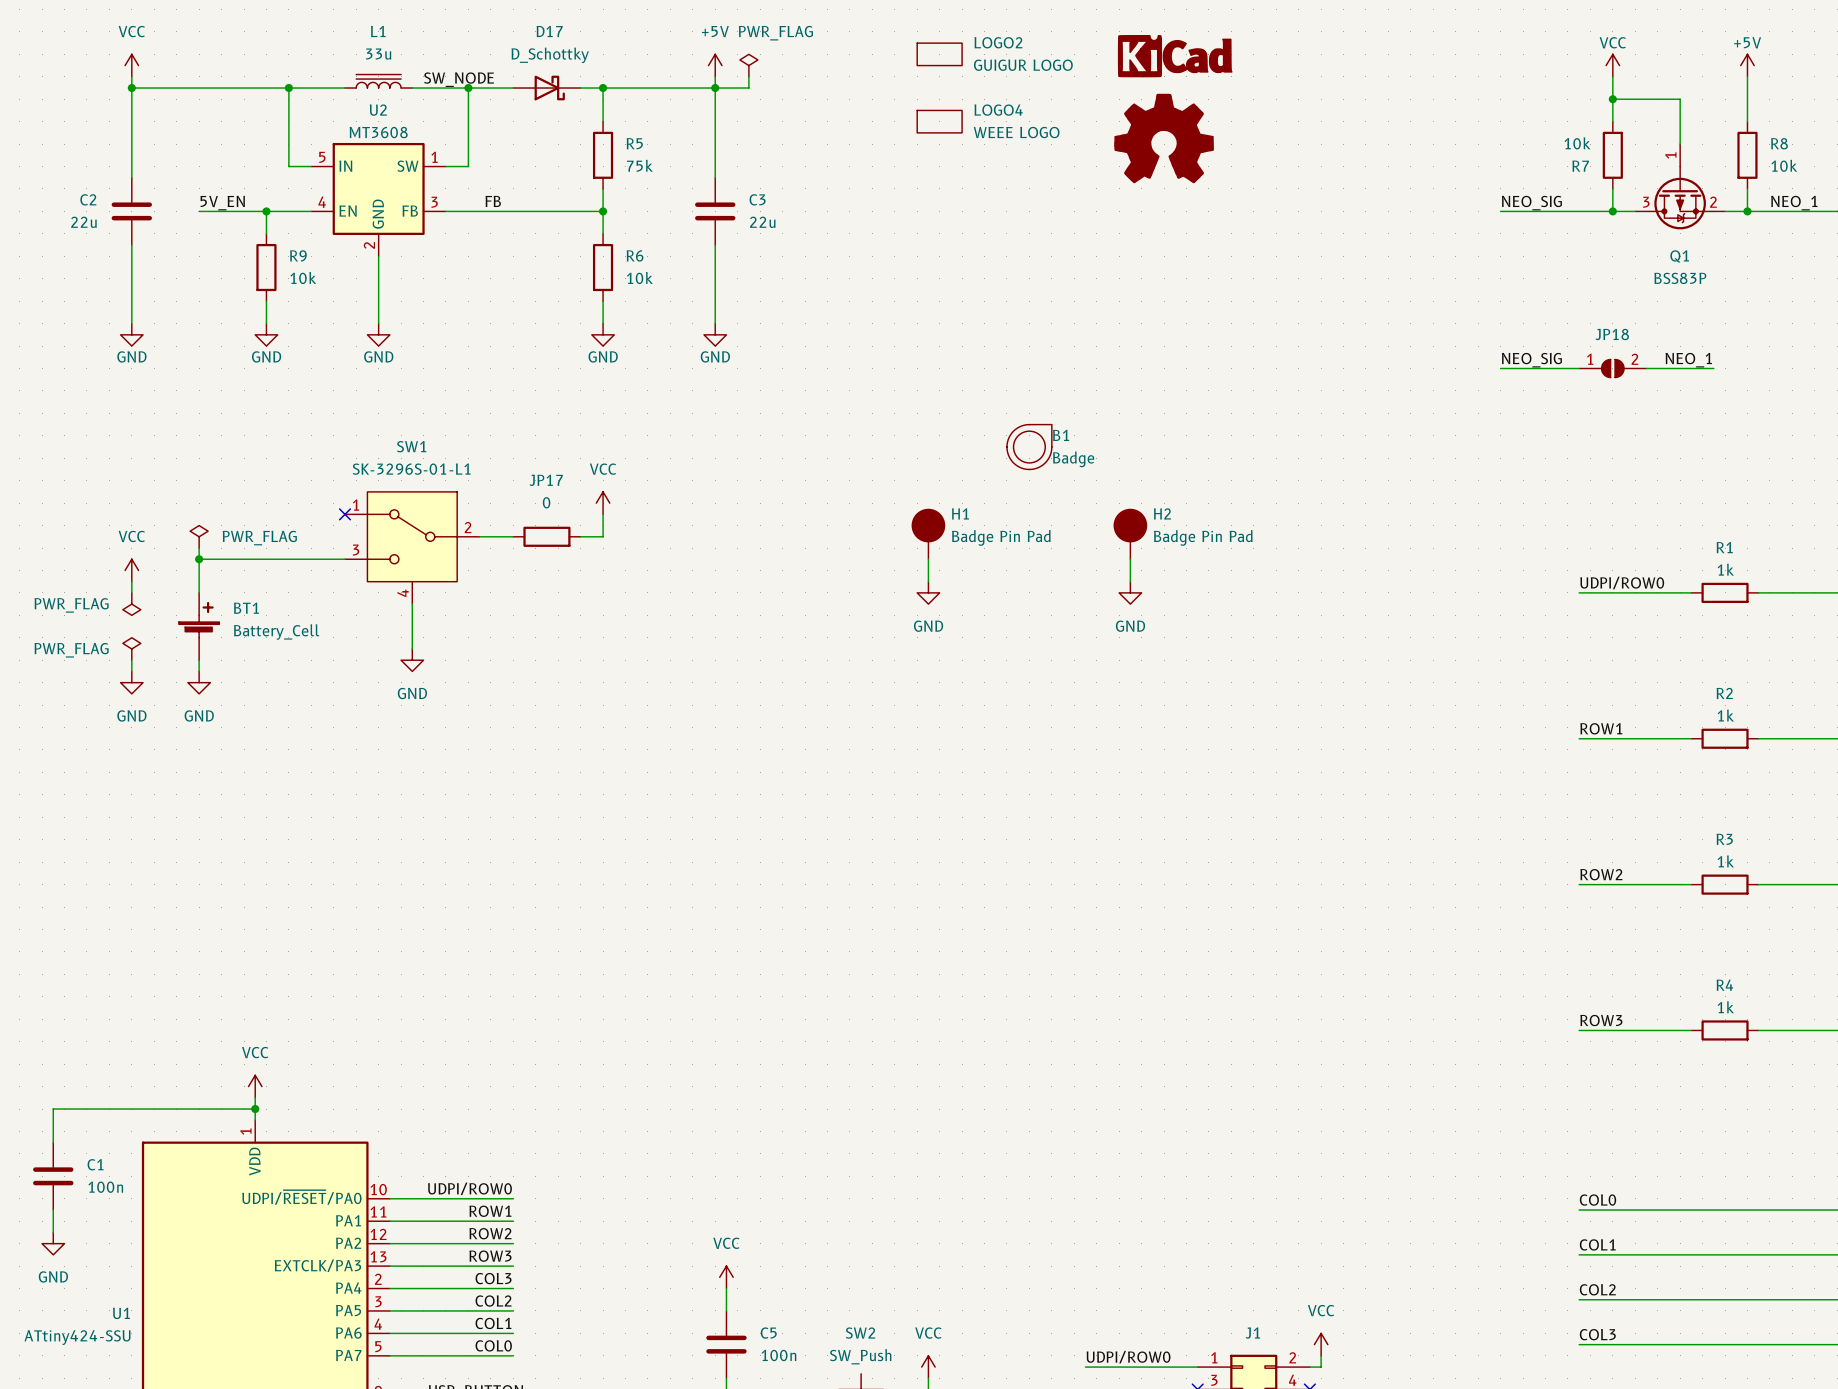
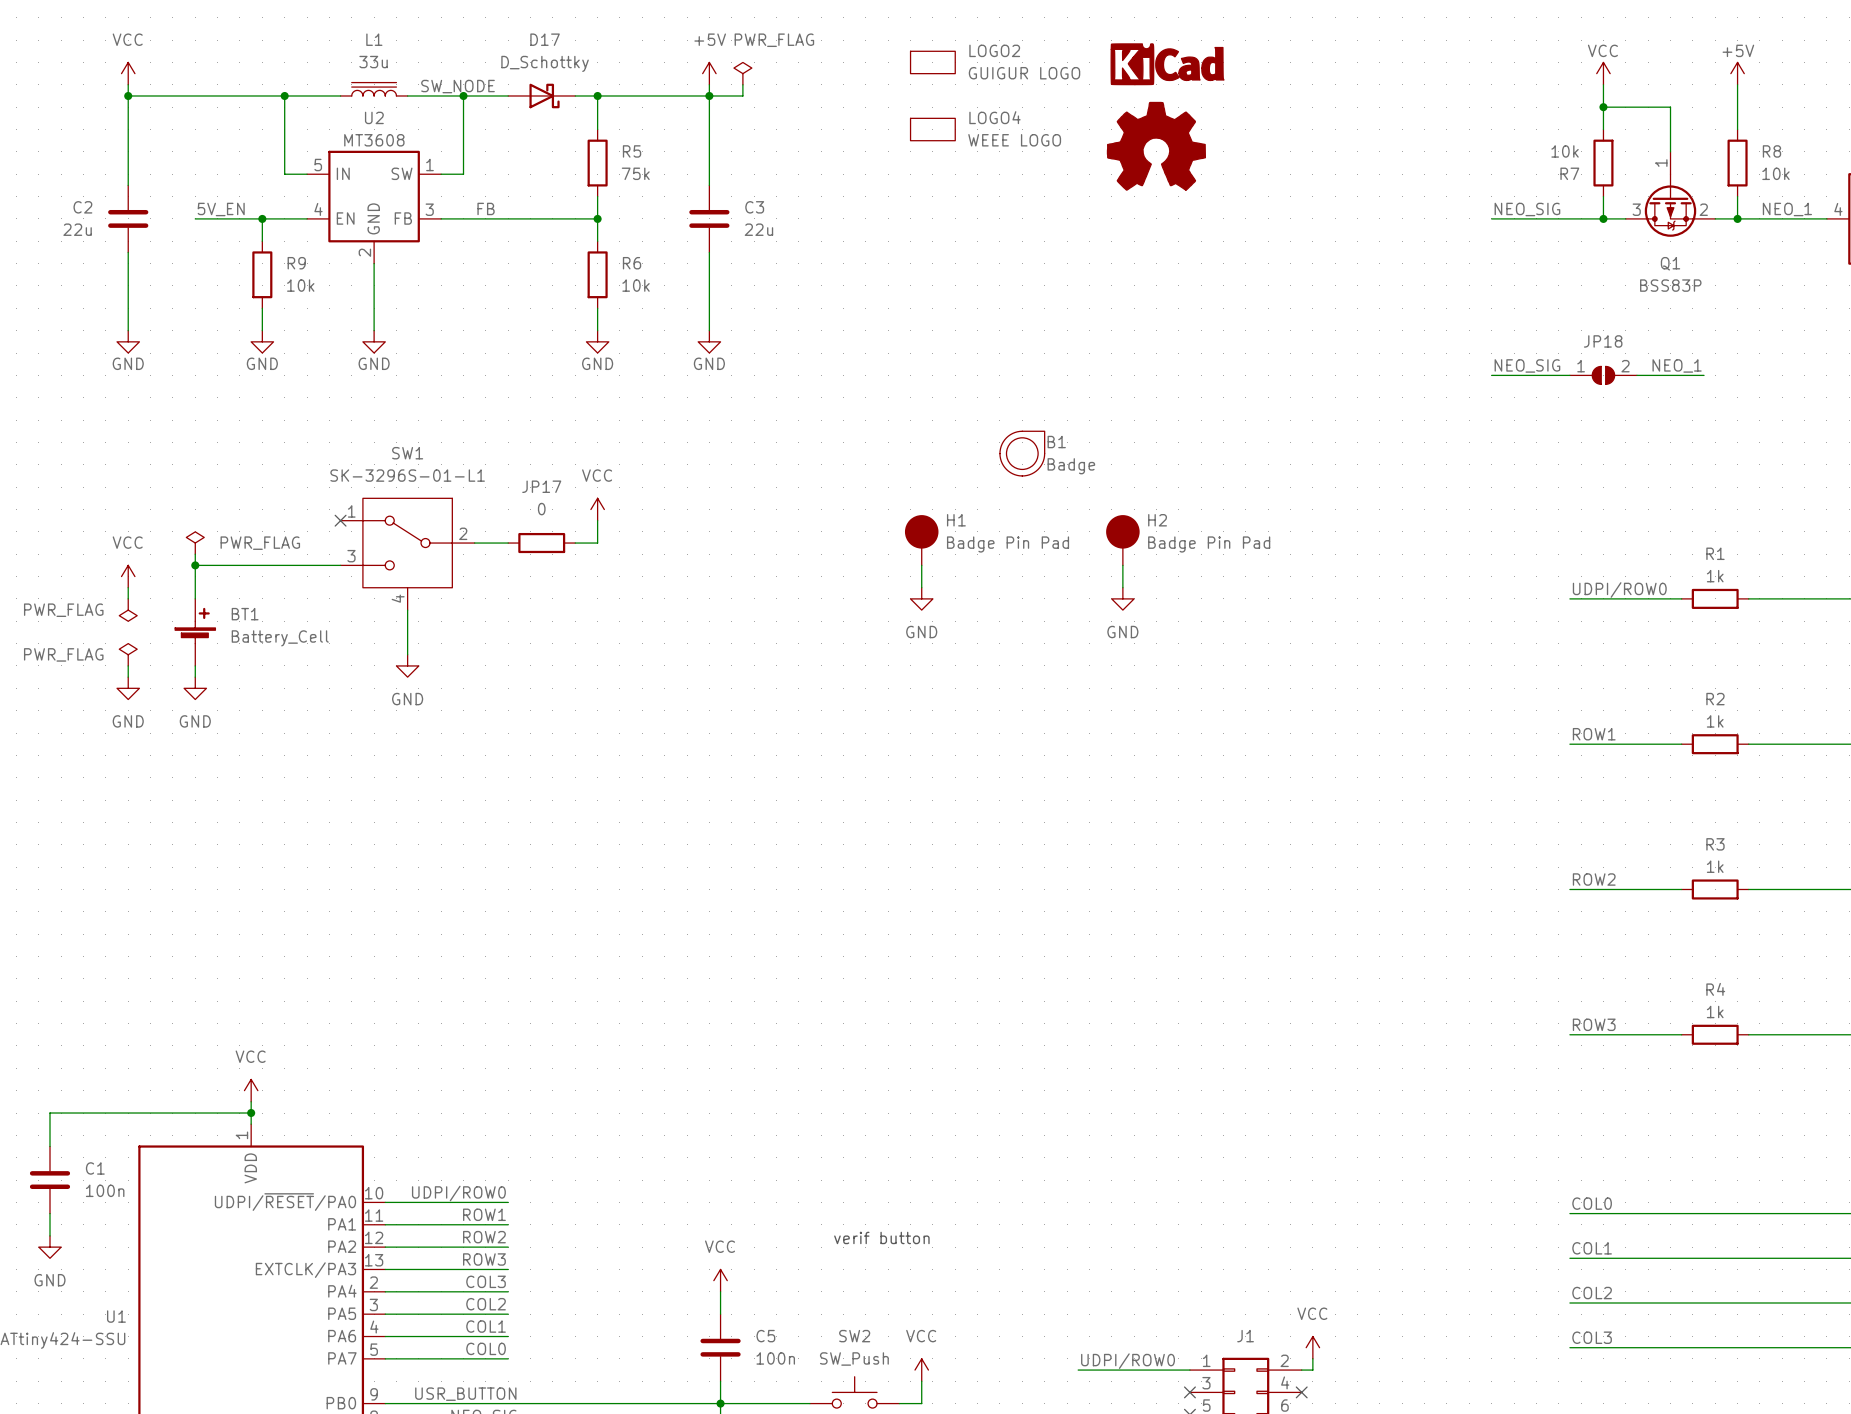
text: none -> verif button (881, 1237)

